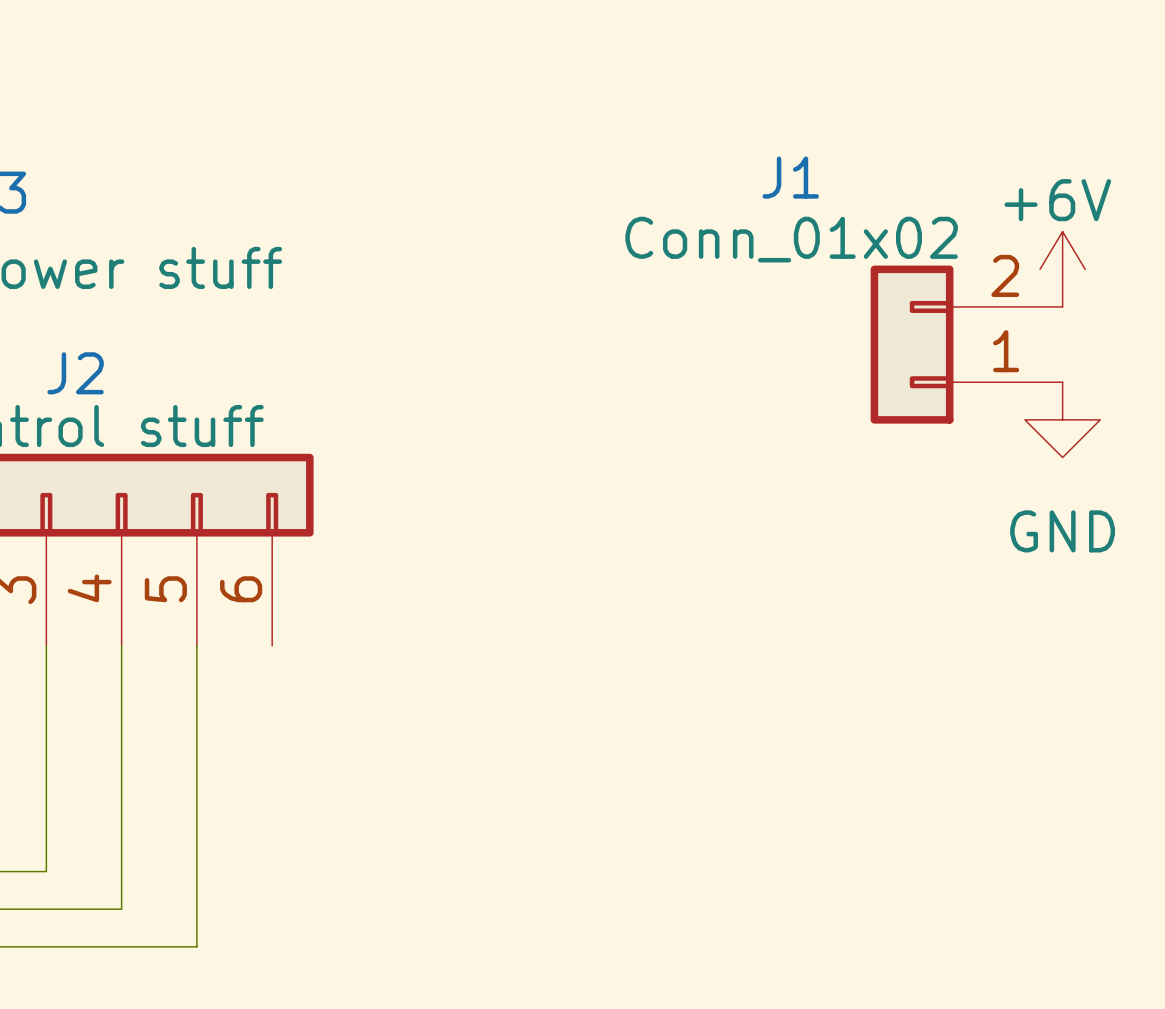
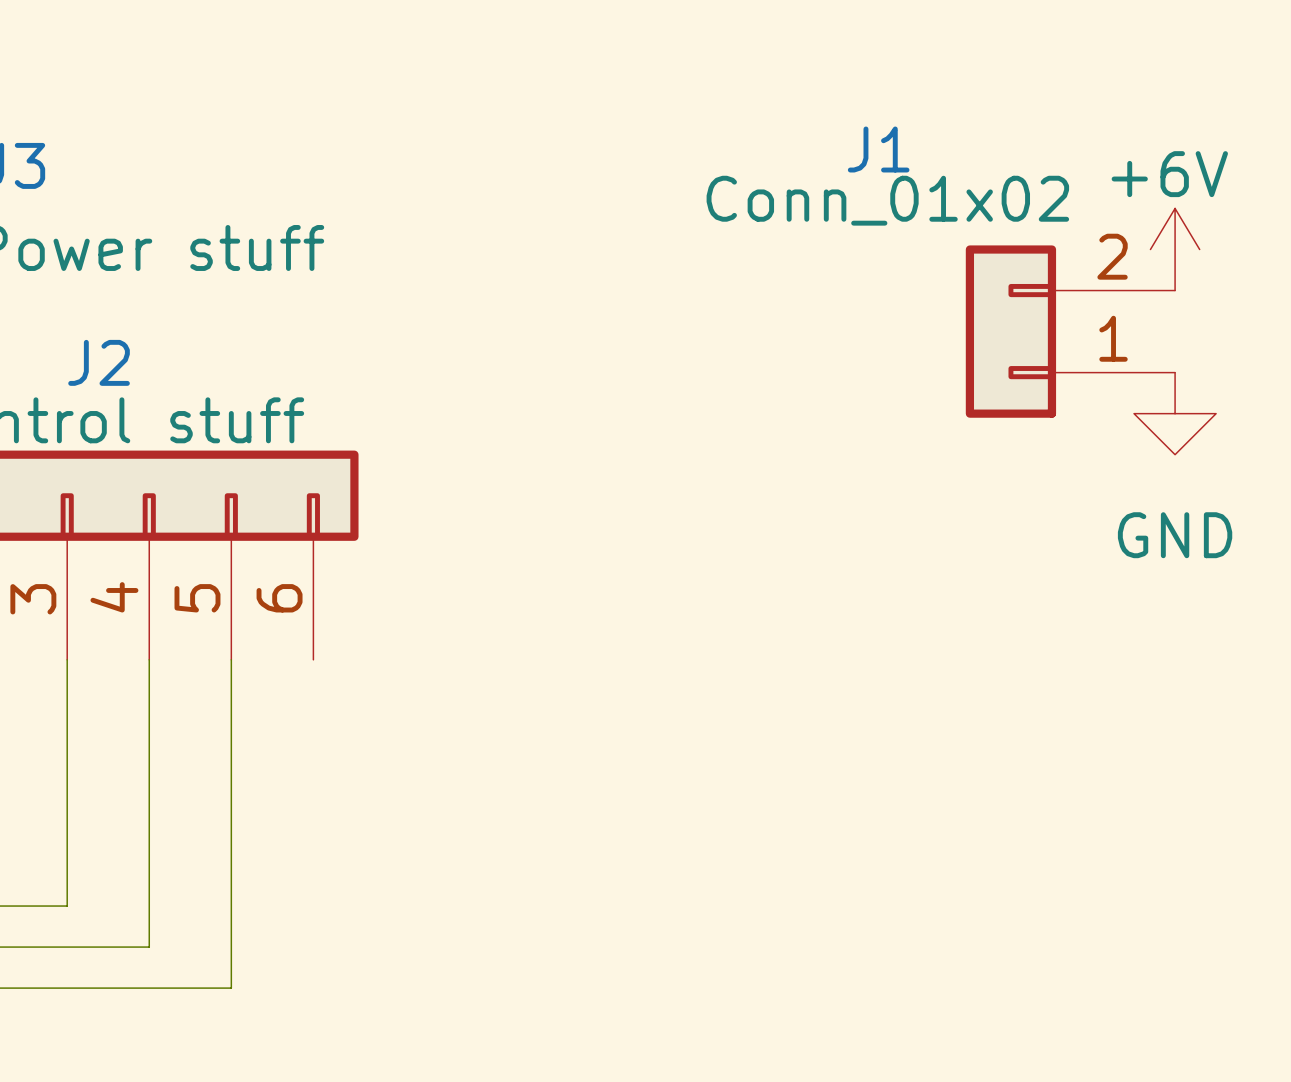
J1 value position: Conn_01x02 (791, 239) -> Conn_01x02 (887, 200)

